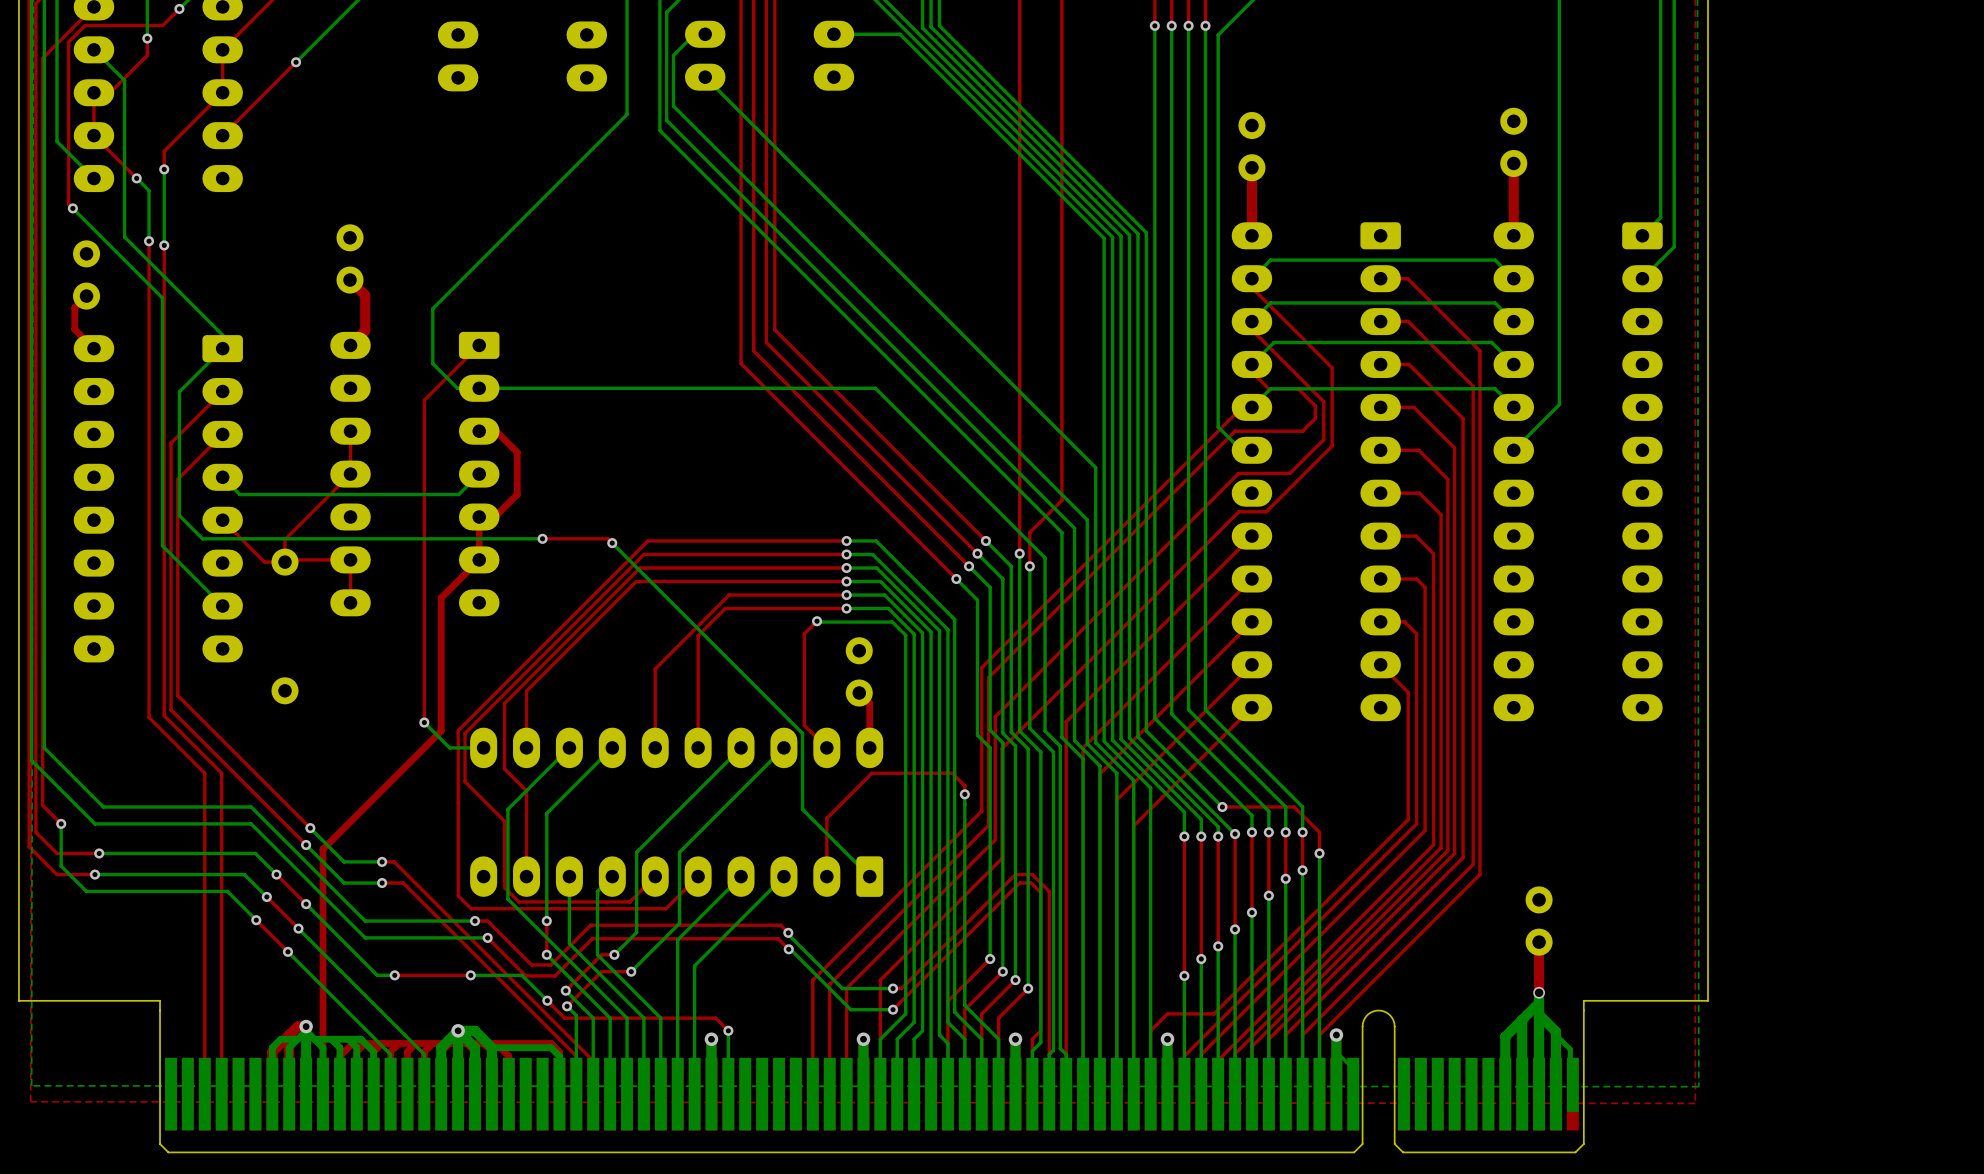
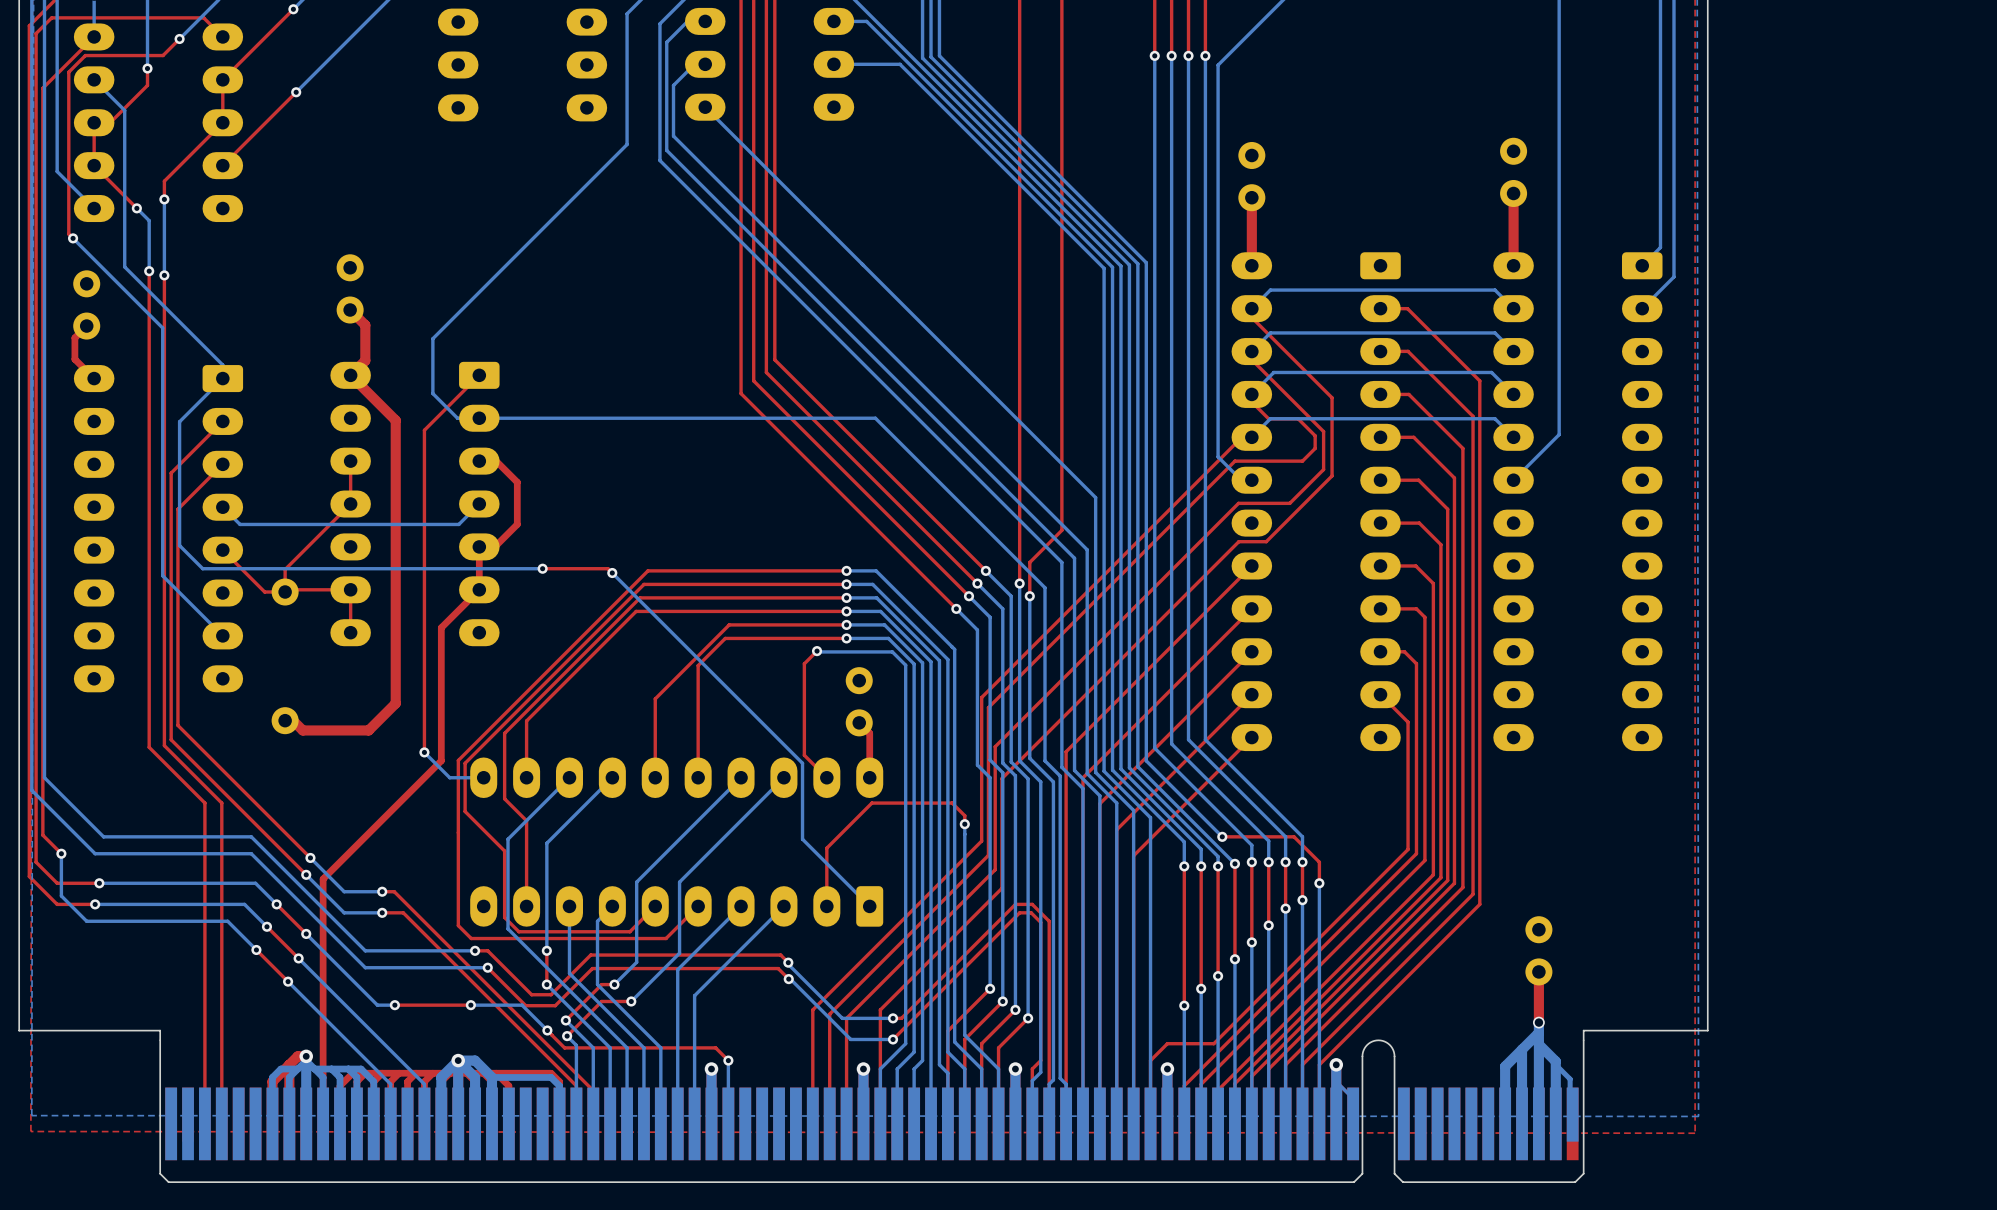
top track: none -> (350, 375) (395, 420) (395, 703) (368, 730) (302, 730) (293, 720) (285, 720)

